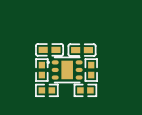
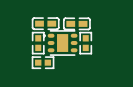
part: (85, 90) -> none

